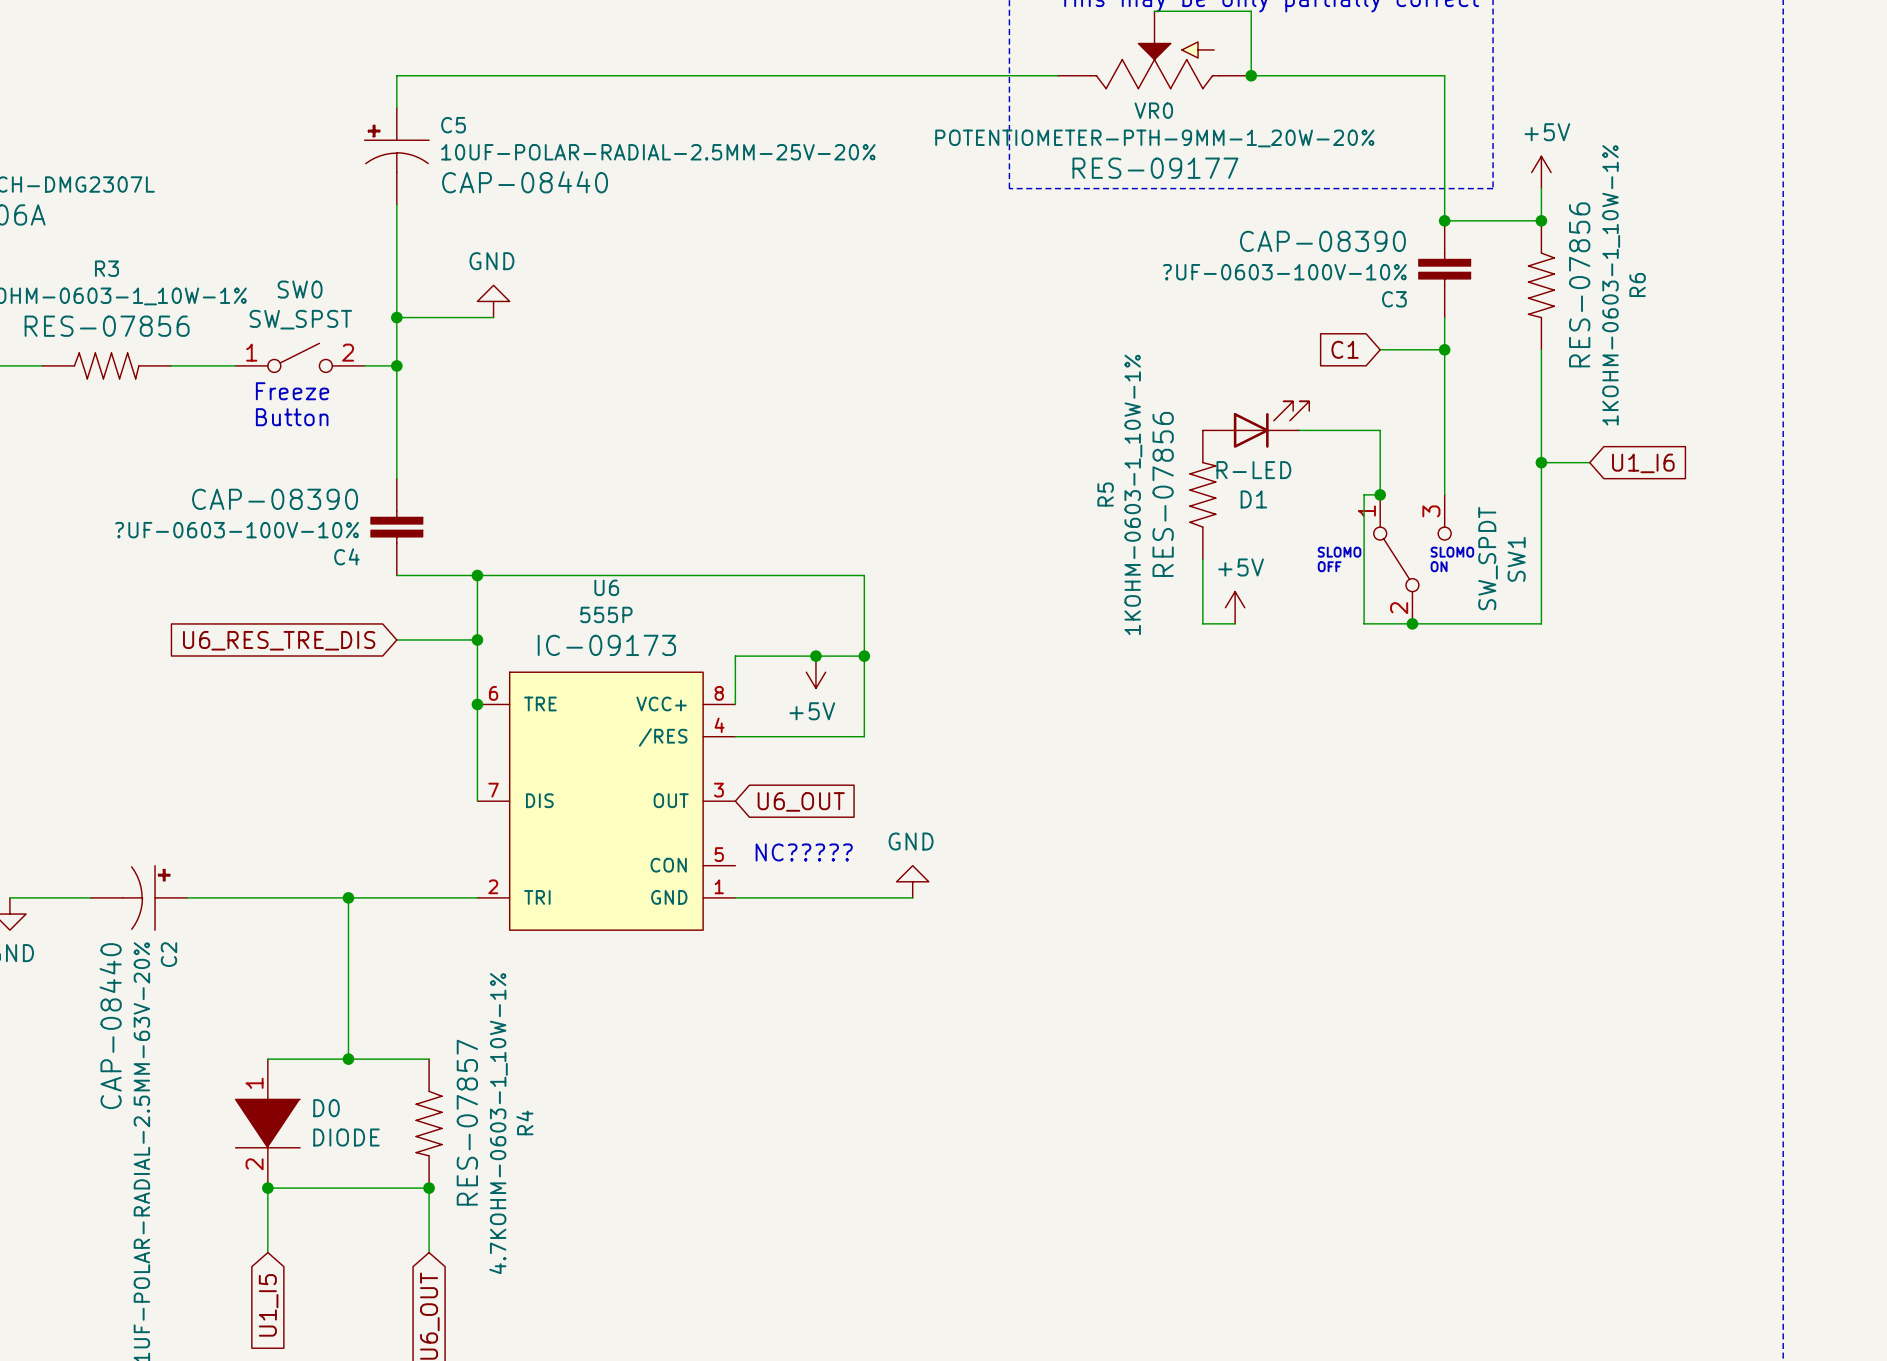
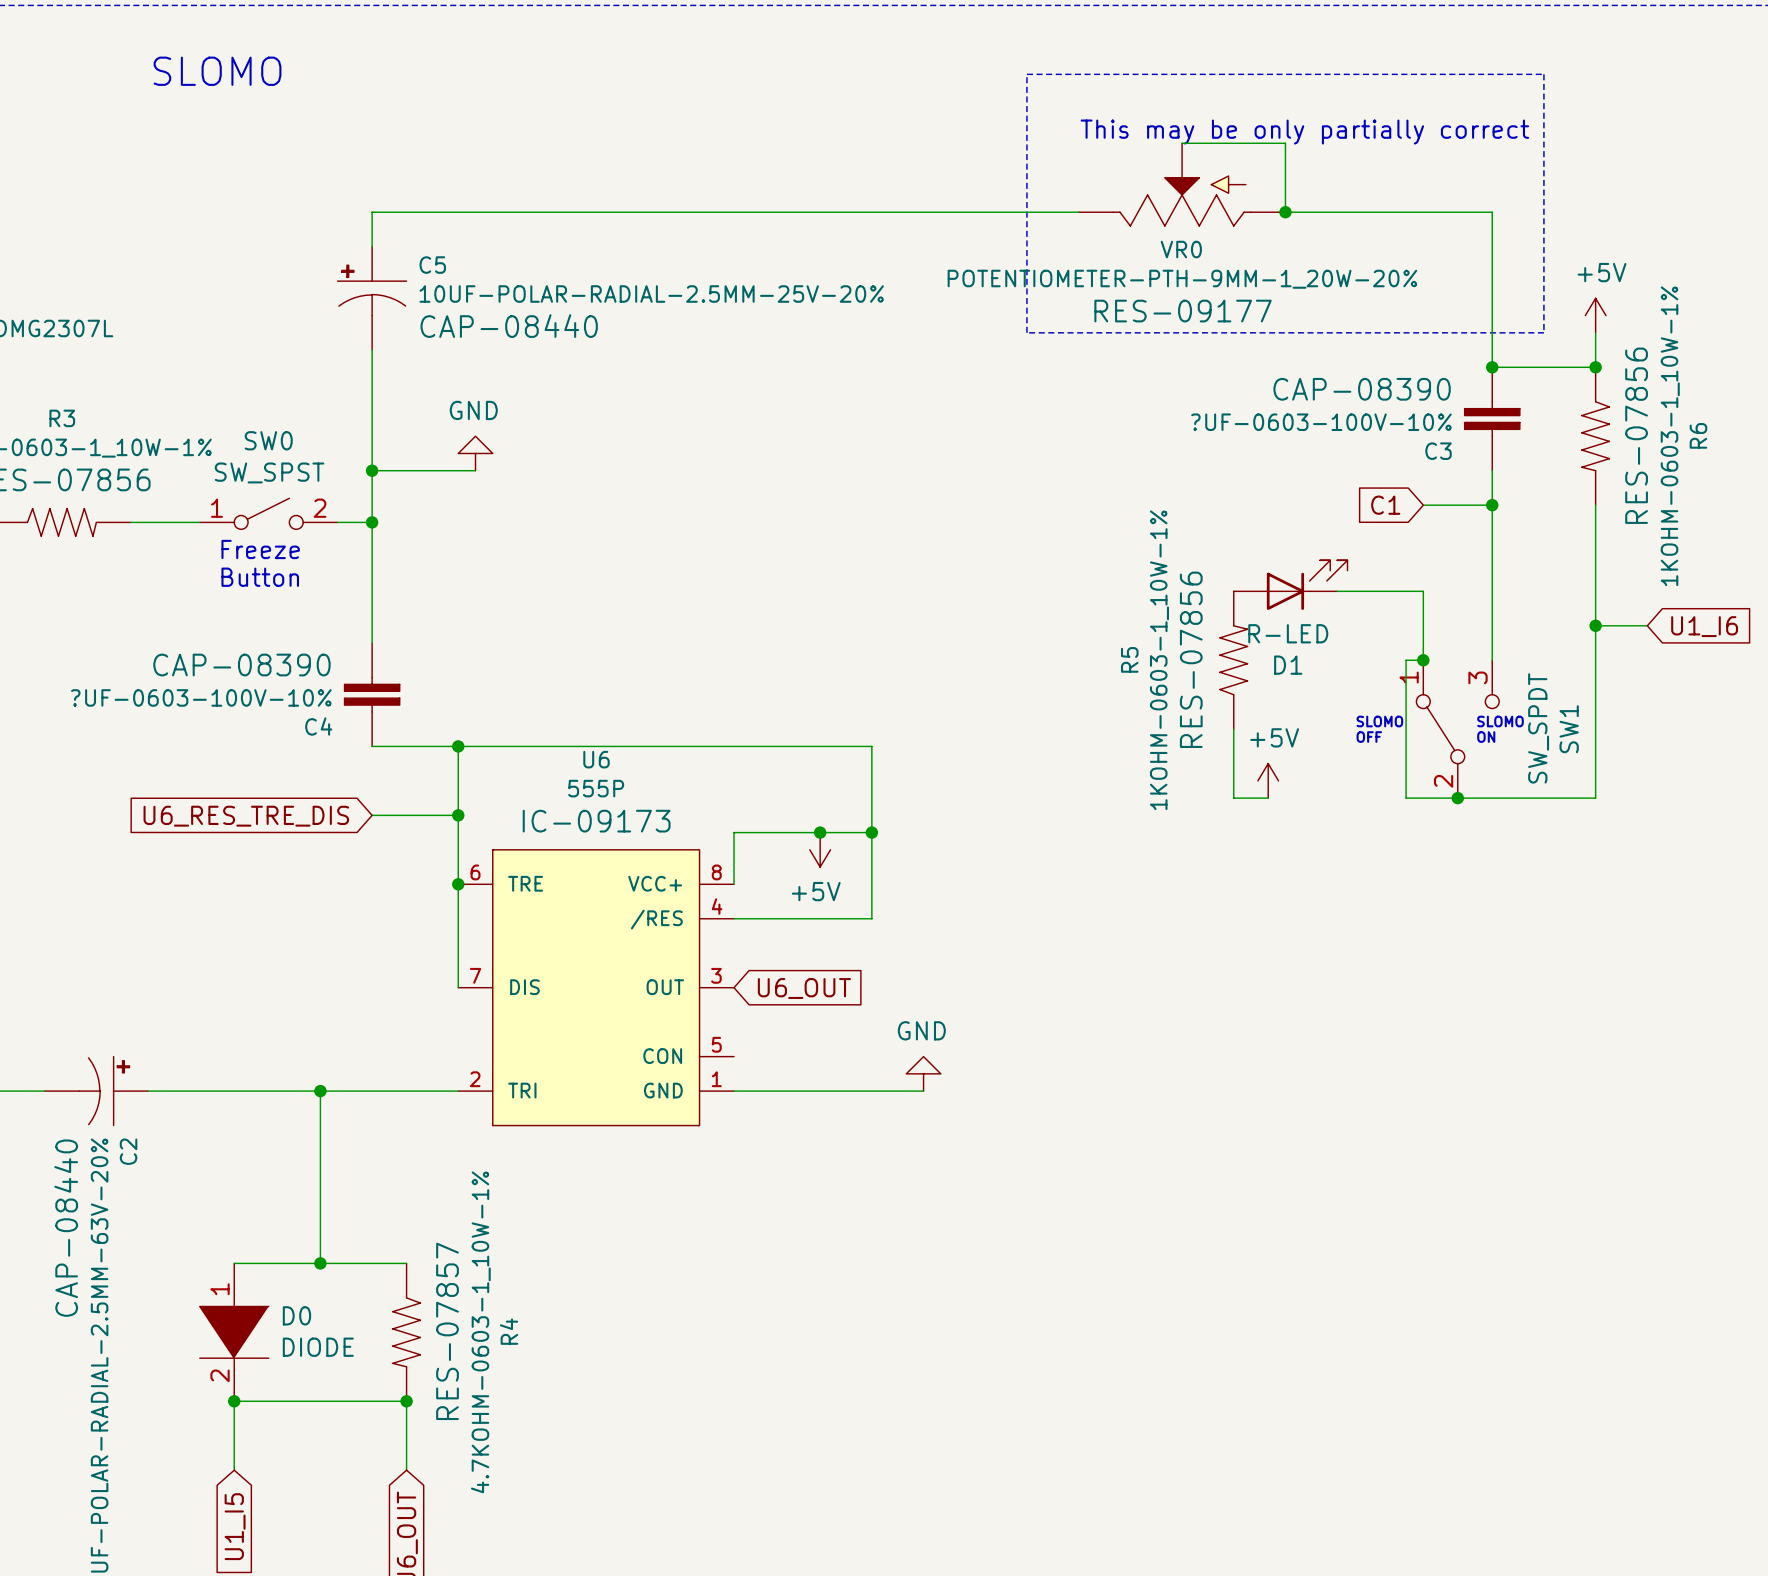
text: NC????? (804, 852) -> none

